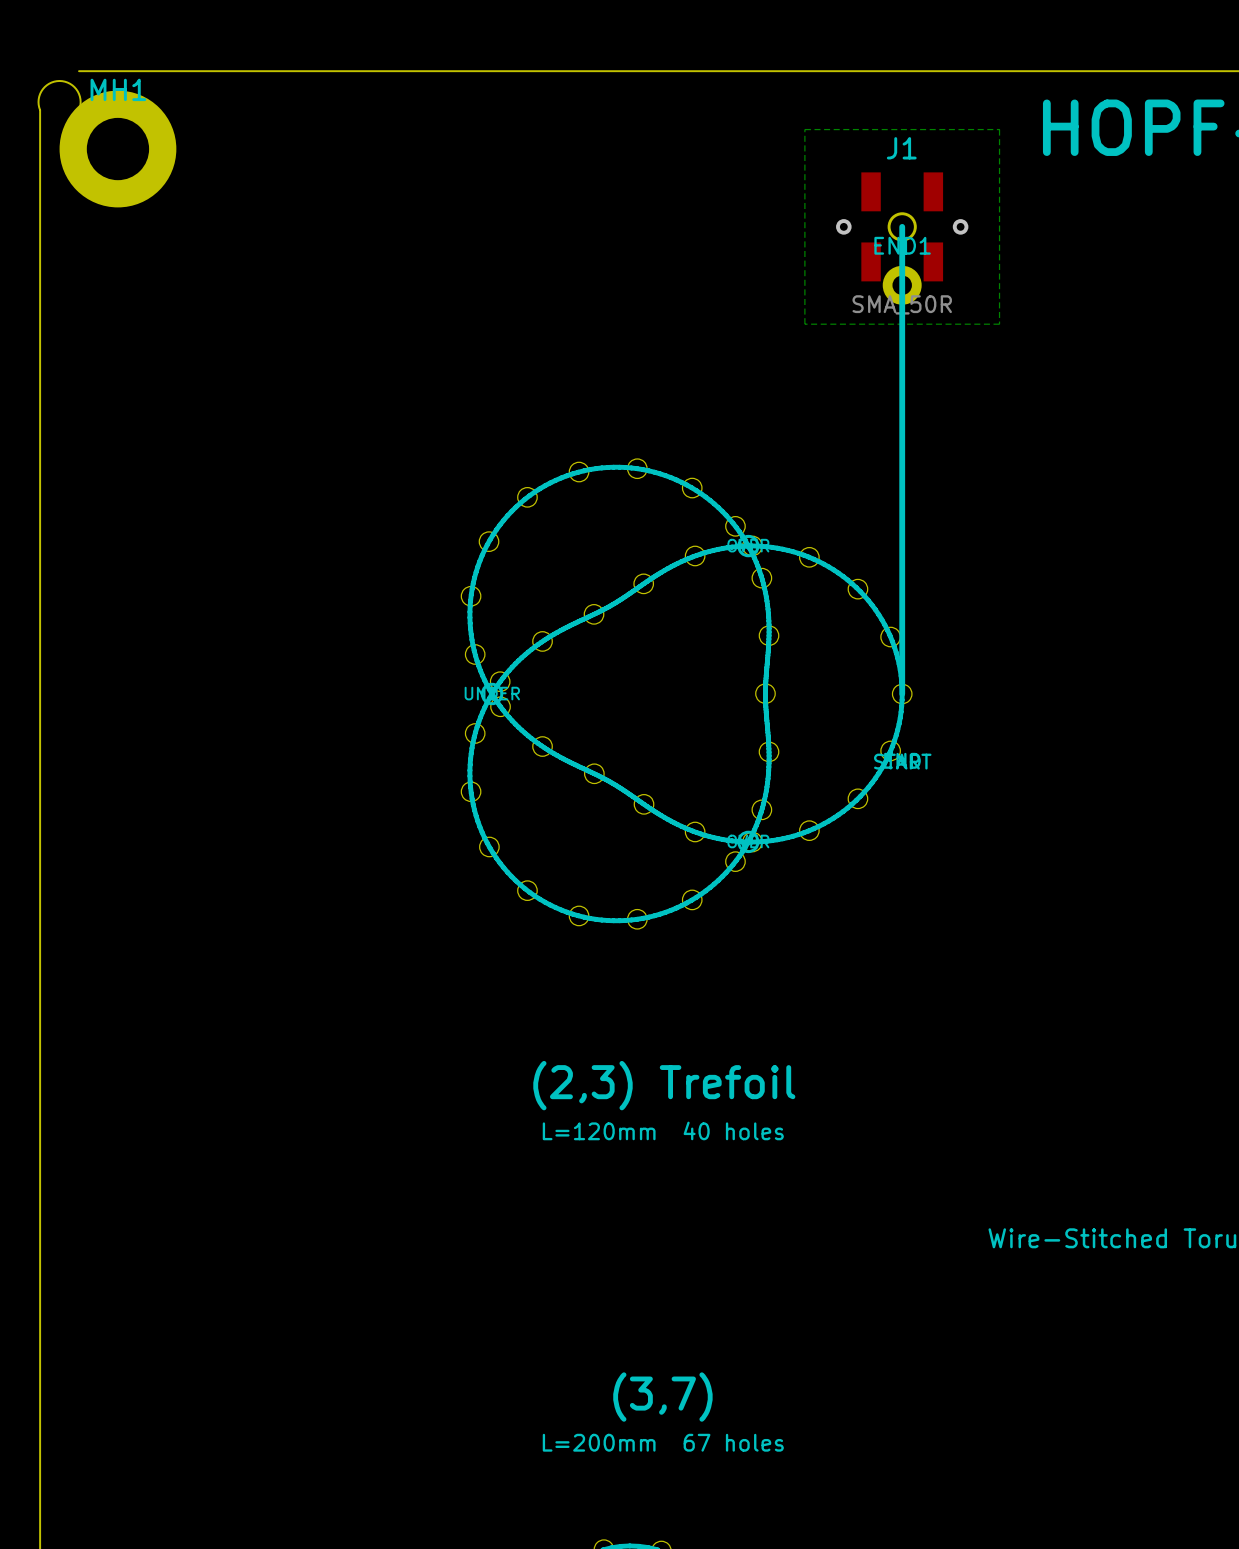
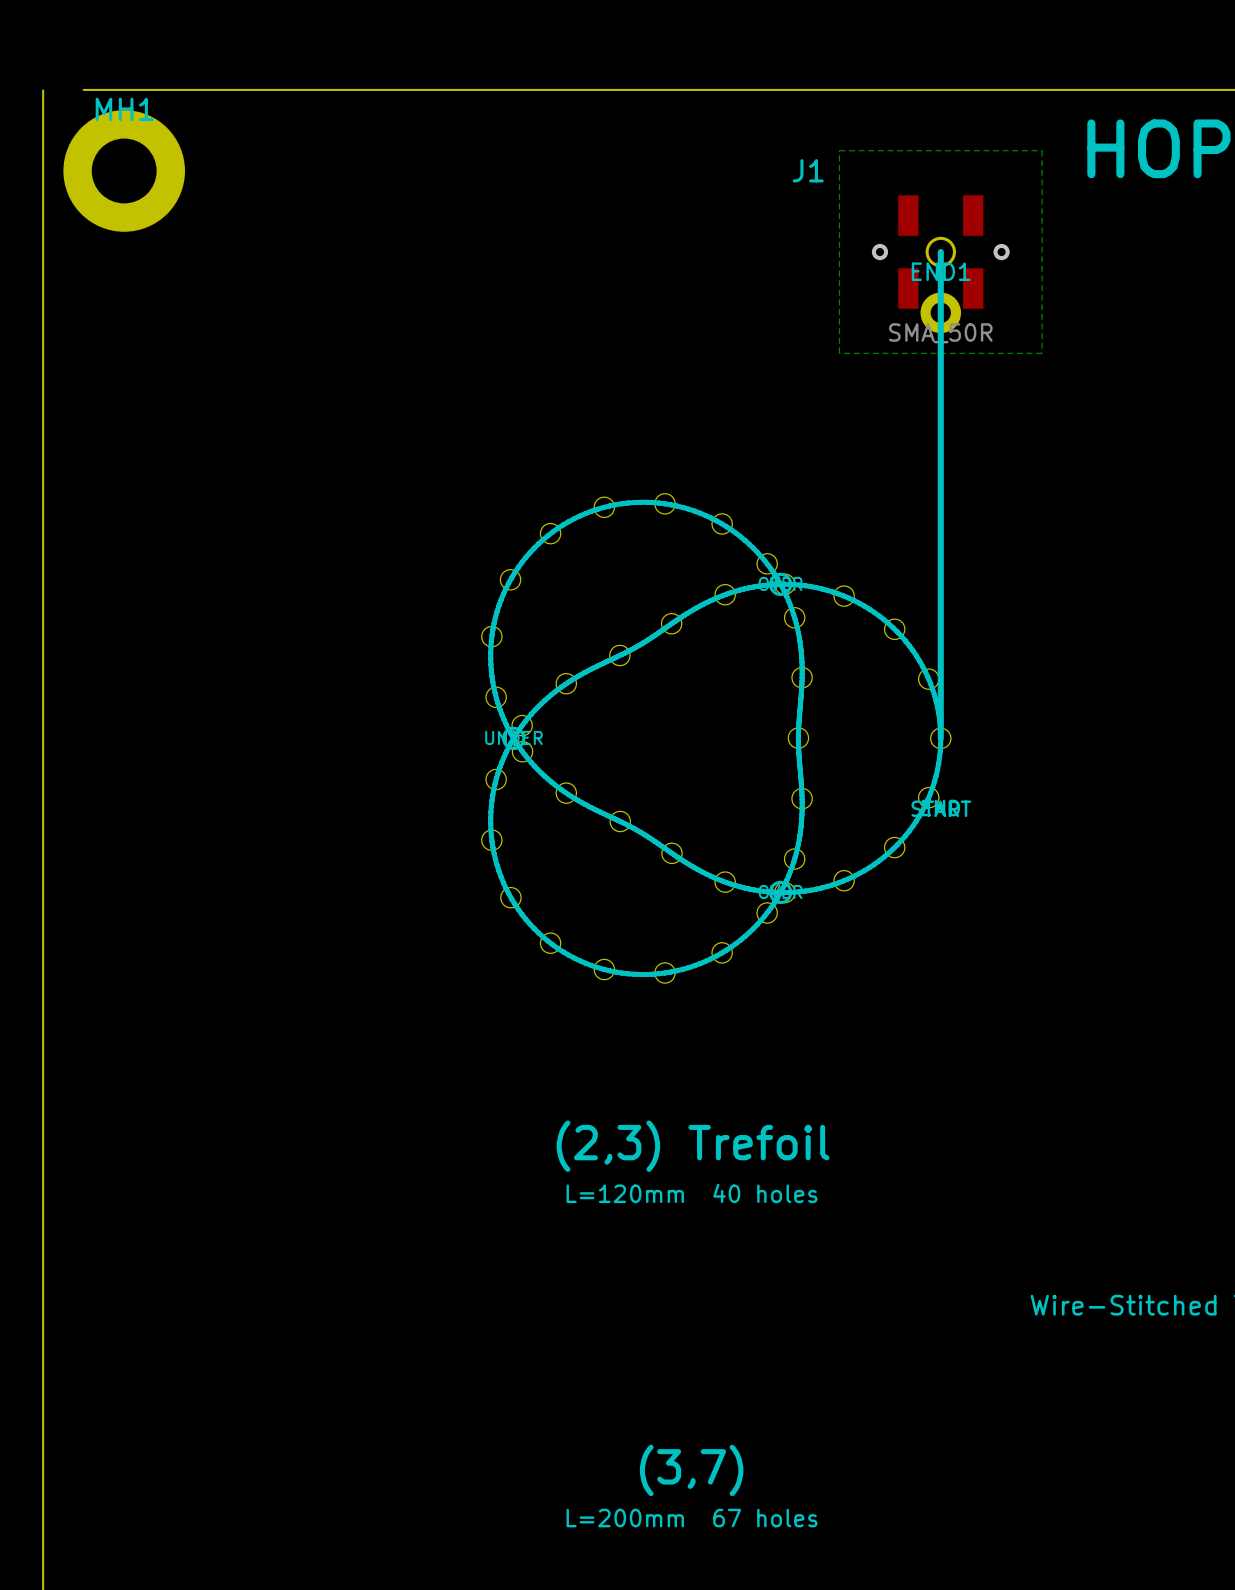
board edge: (40, 110) (38, 99) (42, 89) (49, 83) (59, 80) (67, 82) (76, 89) (80, 99) (79, 110) -> (43, 130) (43, 90)
J1 name position: J1 (901, 148) -> J1 (808, 170)

